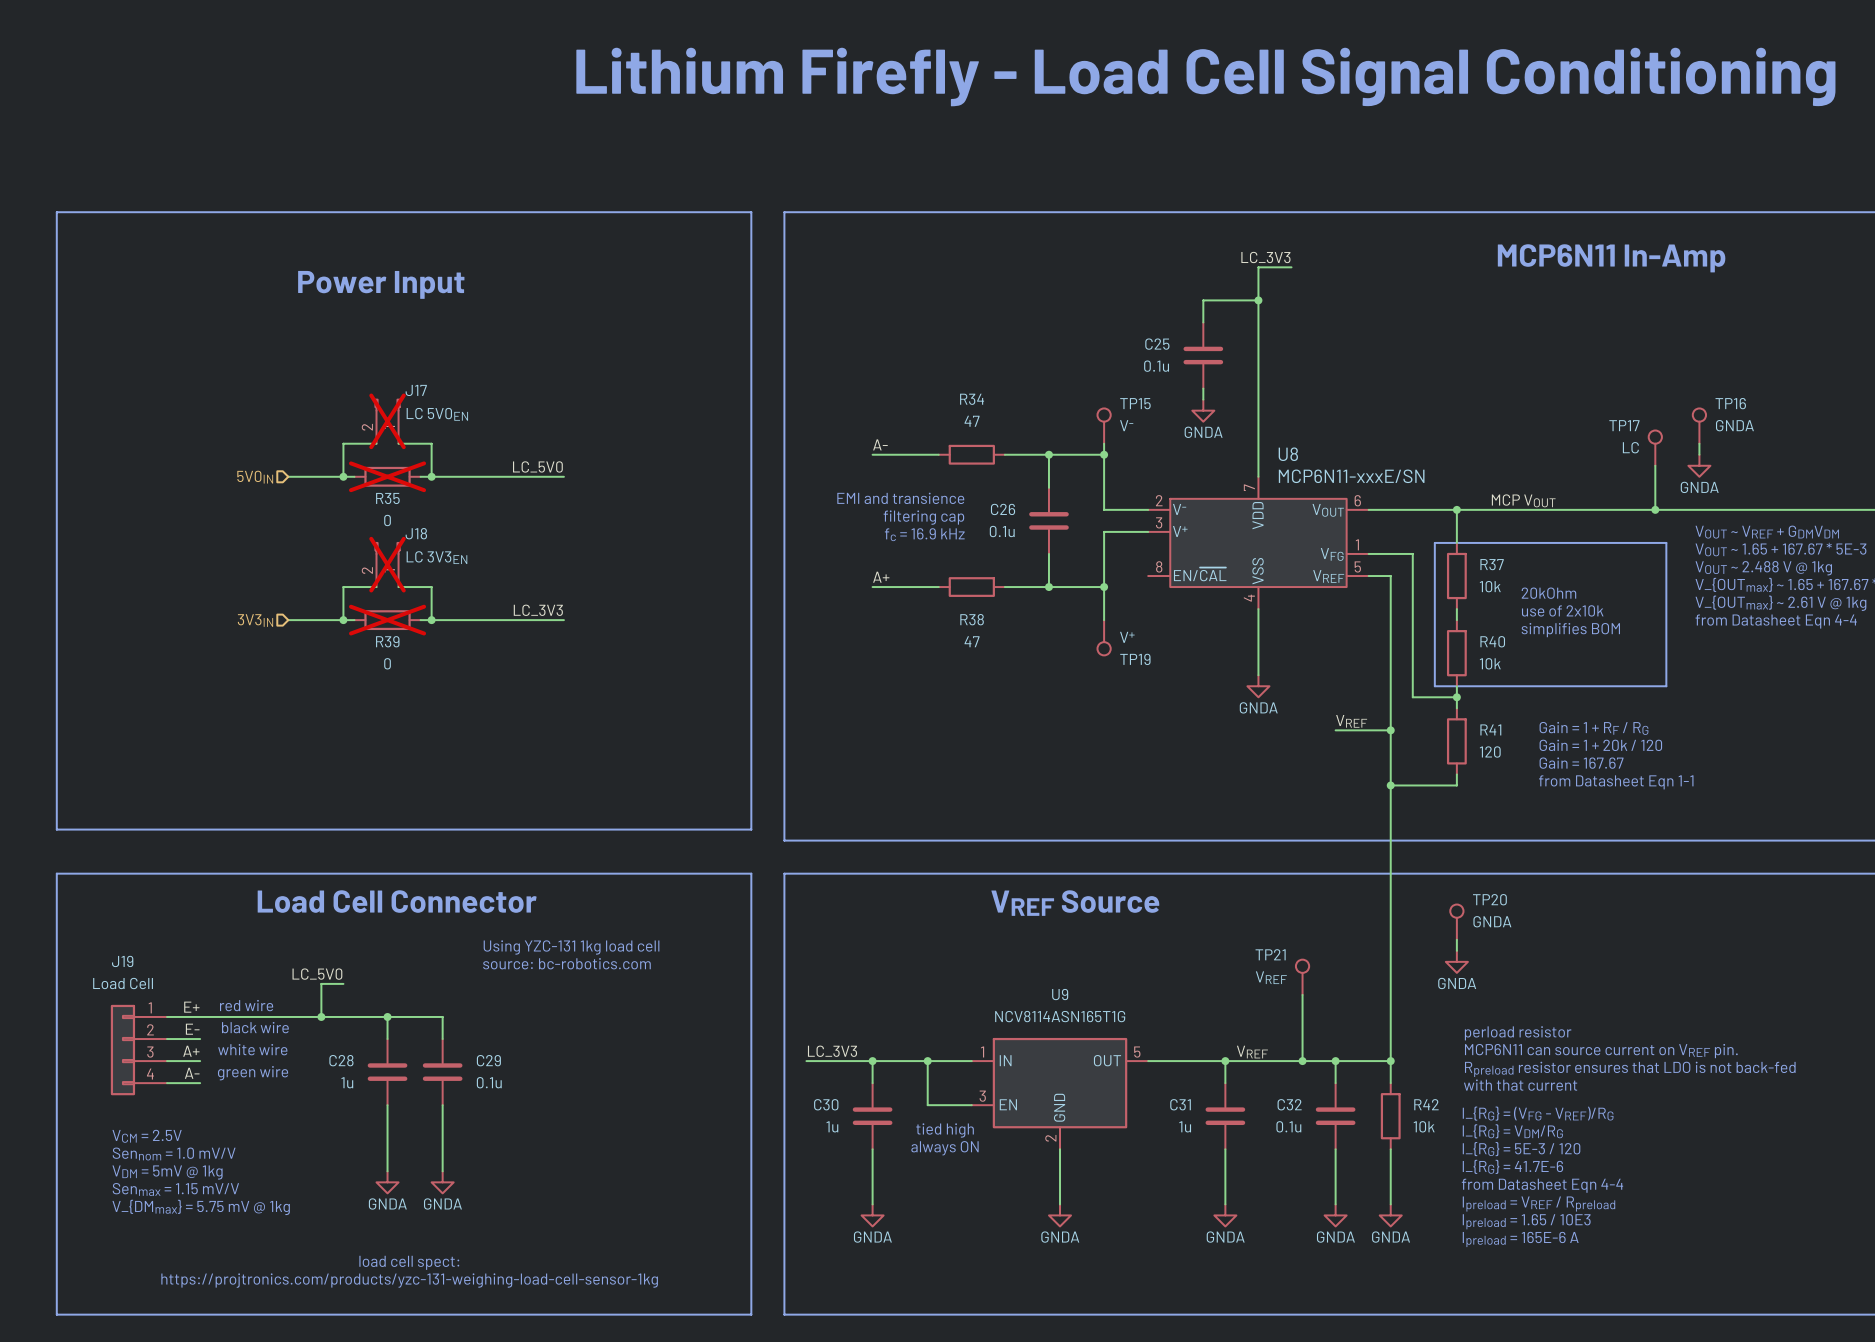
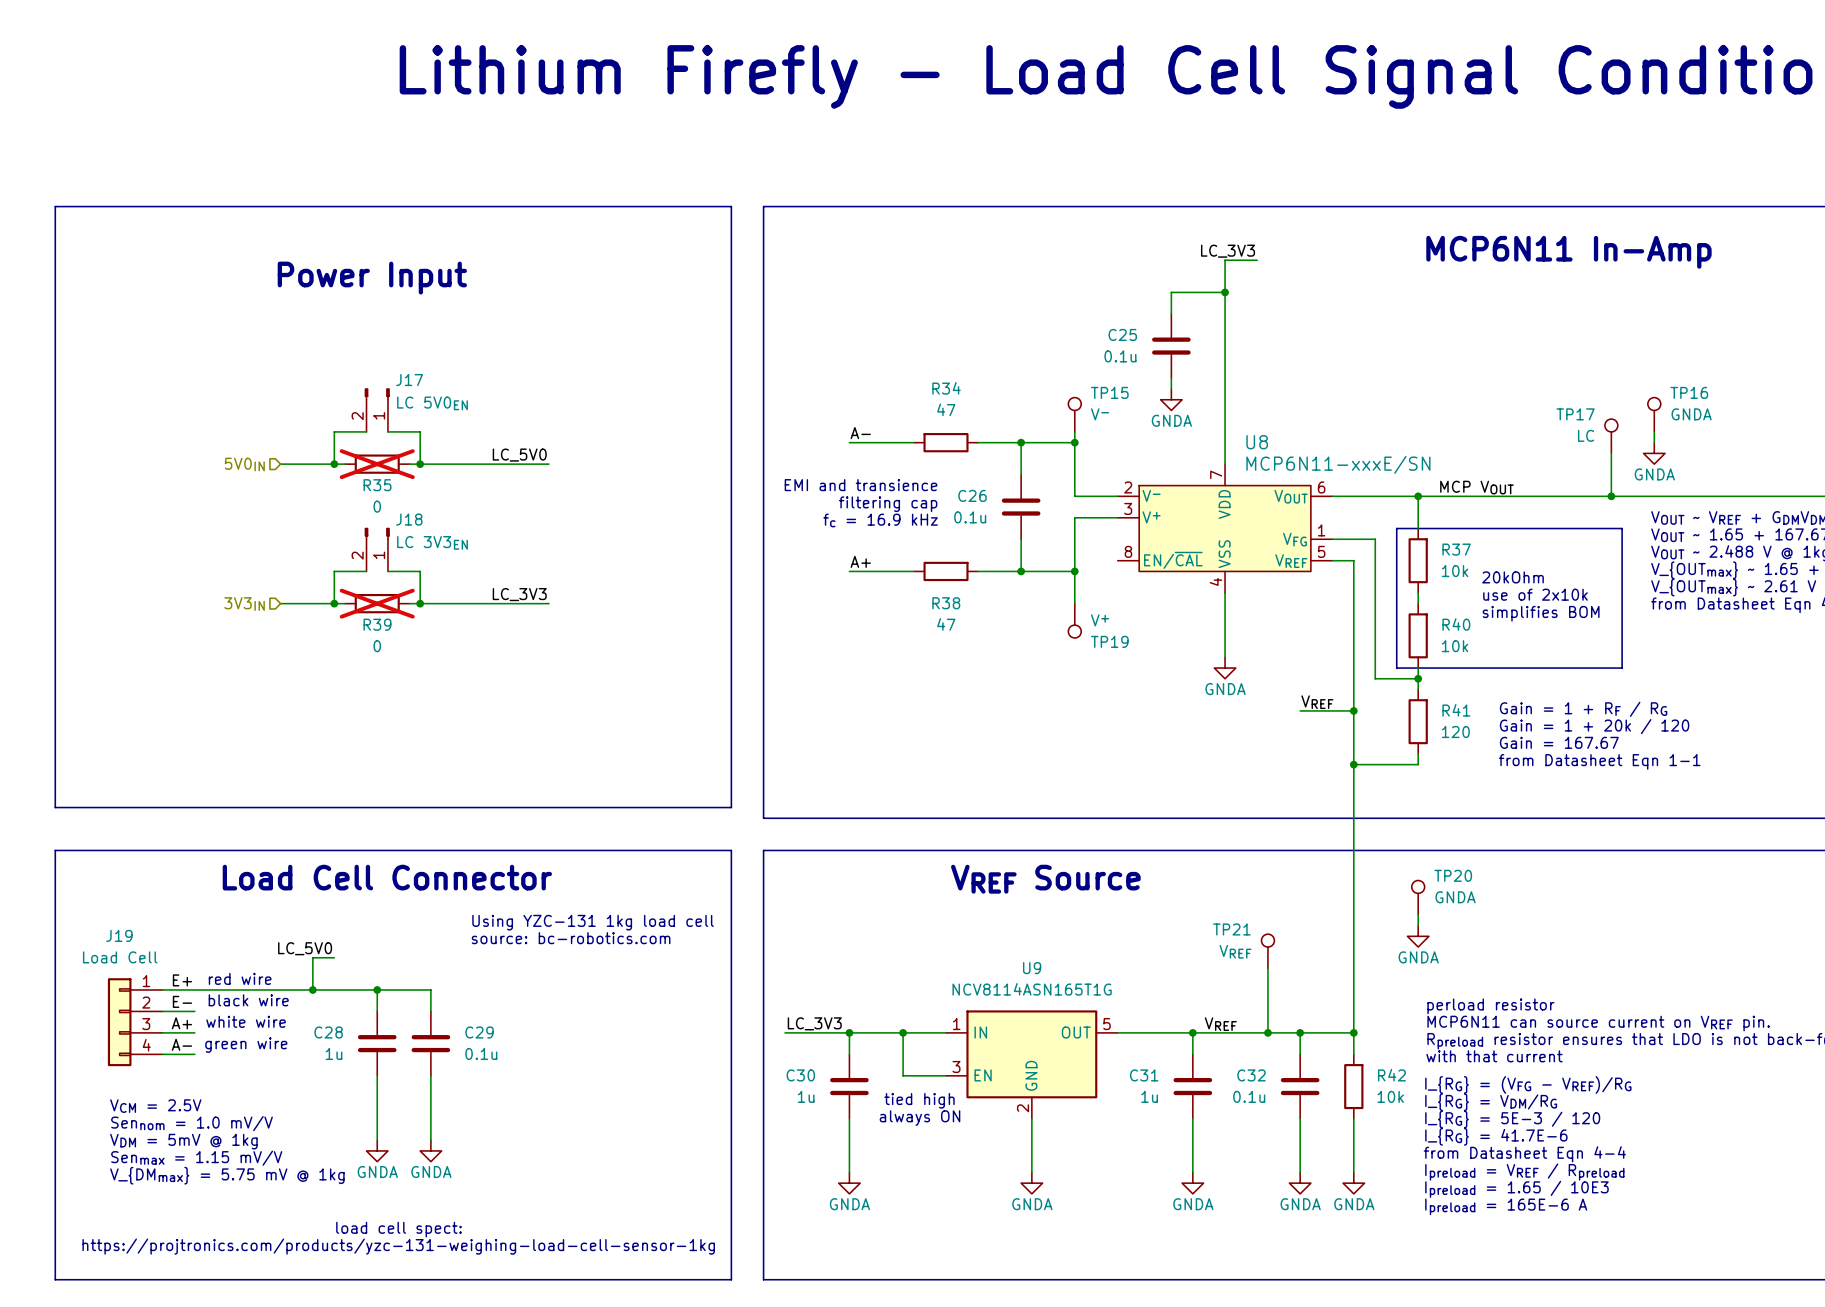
J17 do-not-place cross: (387, 421) -> none
J18 do-not-place cross: (387, 564) -> none

